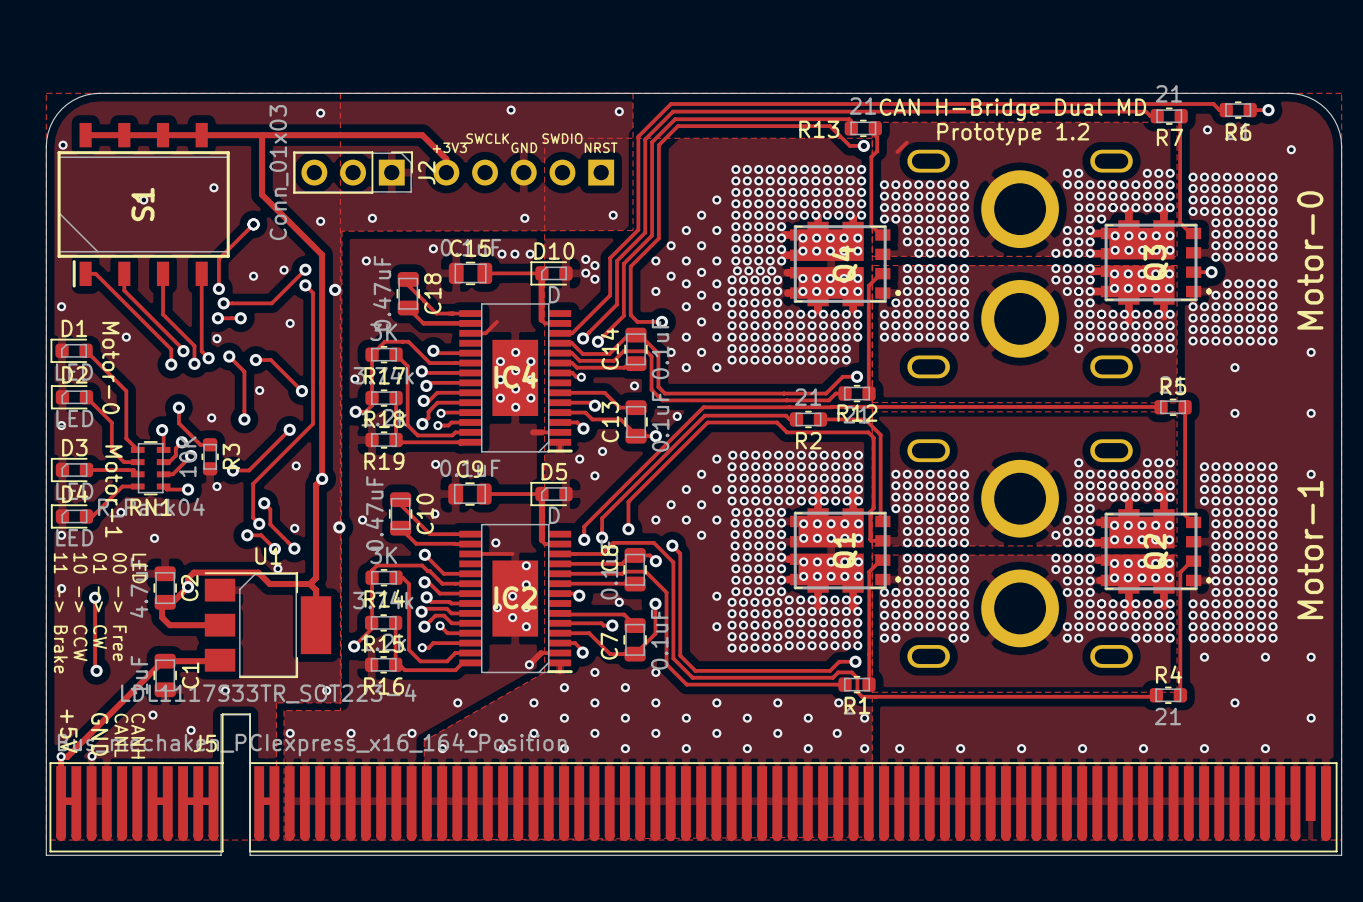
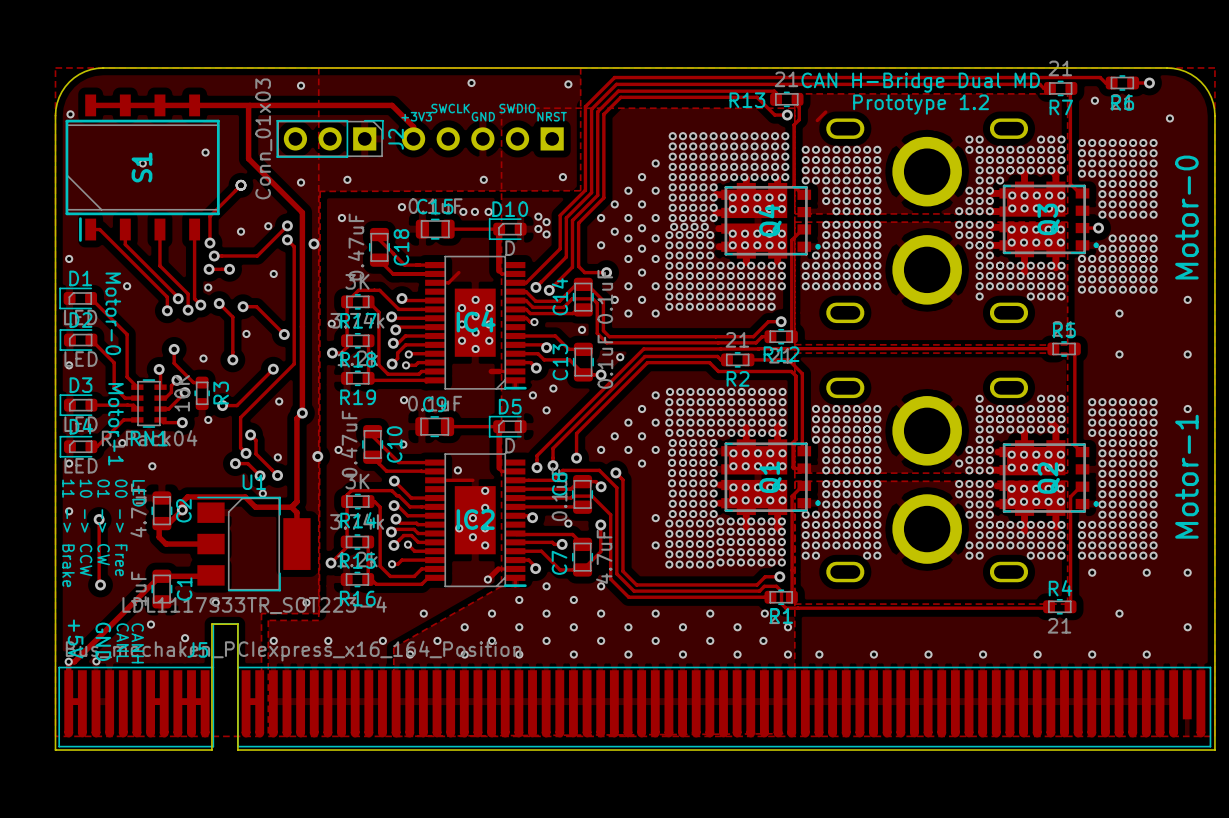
C7 value: 0.1uF (659, 639) -> 4.7uF (604, 556)

